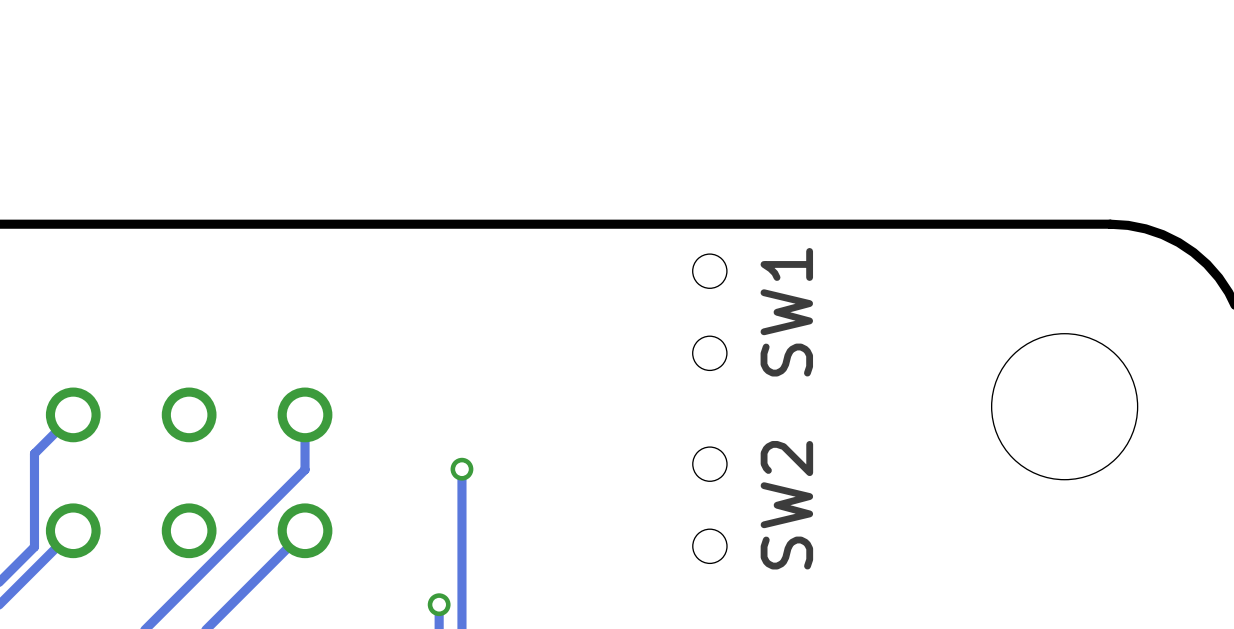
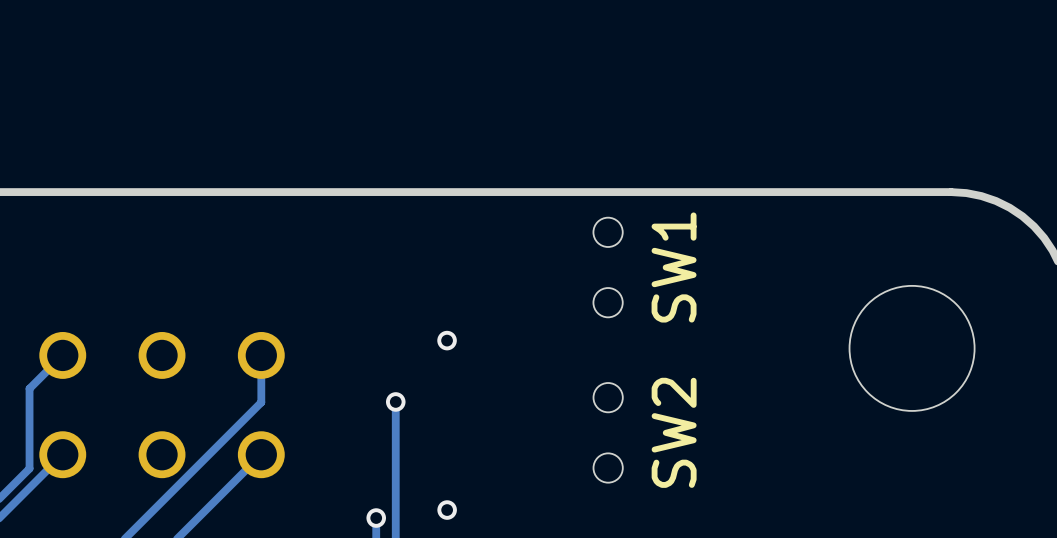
via: none -> (447, 340)
via: none -> (447, 510)

